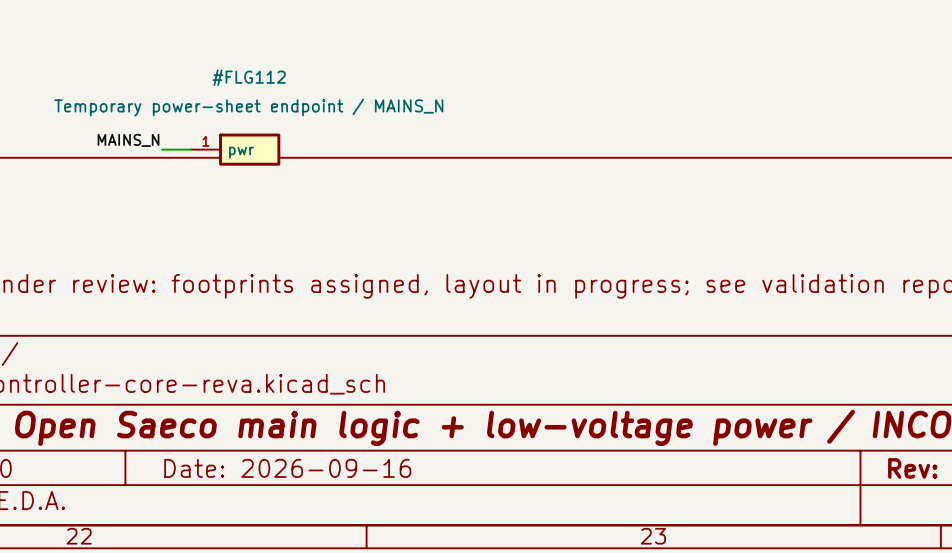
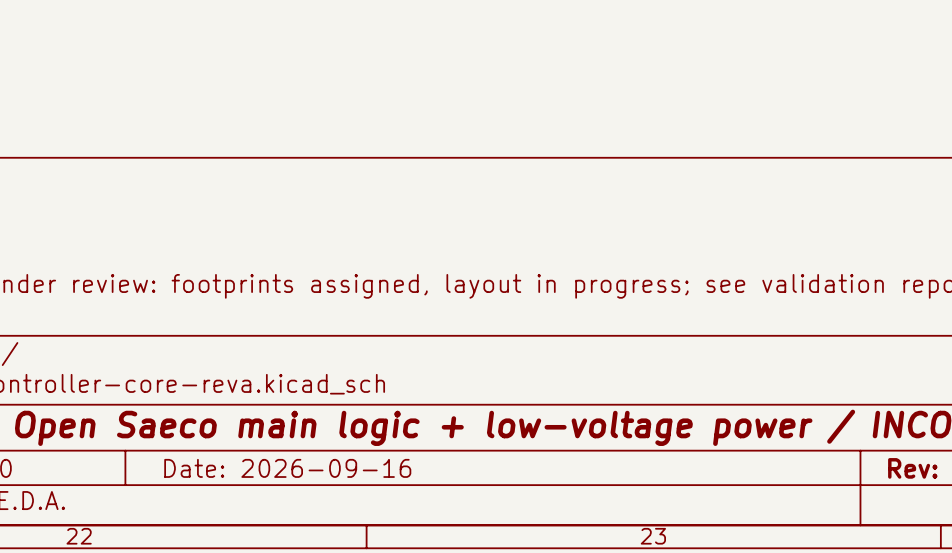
label: MAINS_N (128, 140) -> none
wire: (162, 149) (191, 149) -> none
#FLG112: Temporary power-sheet endpoint / MAINS_N (235, 149) -> none

